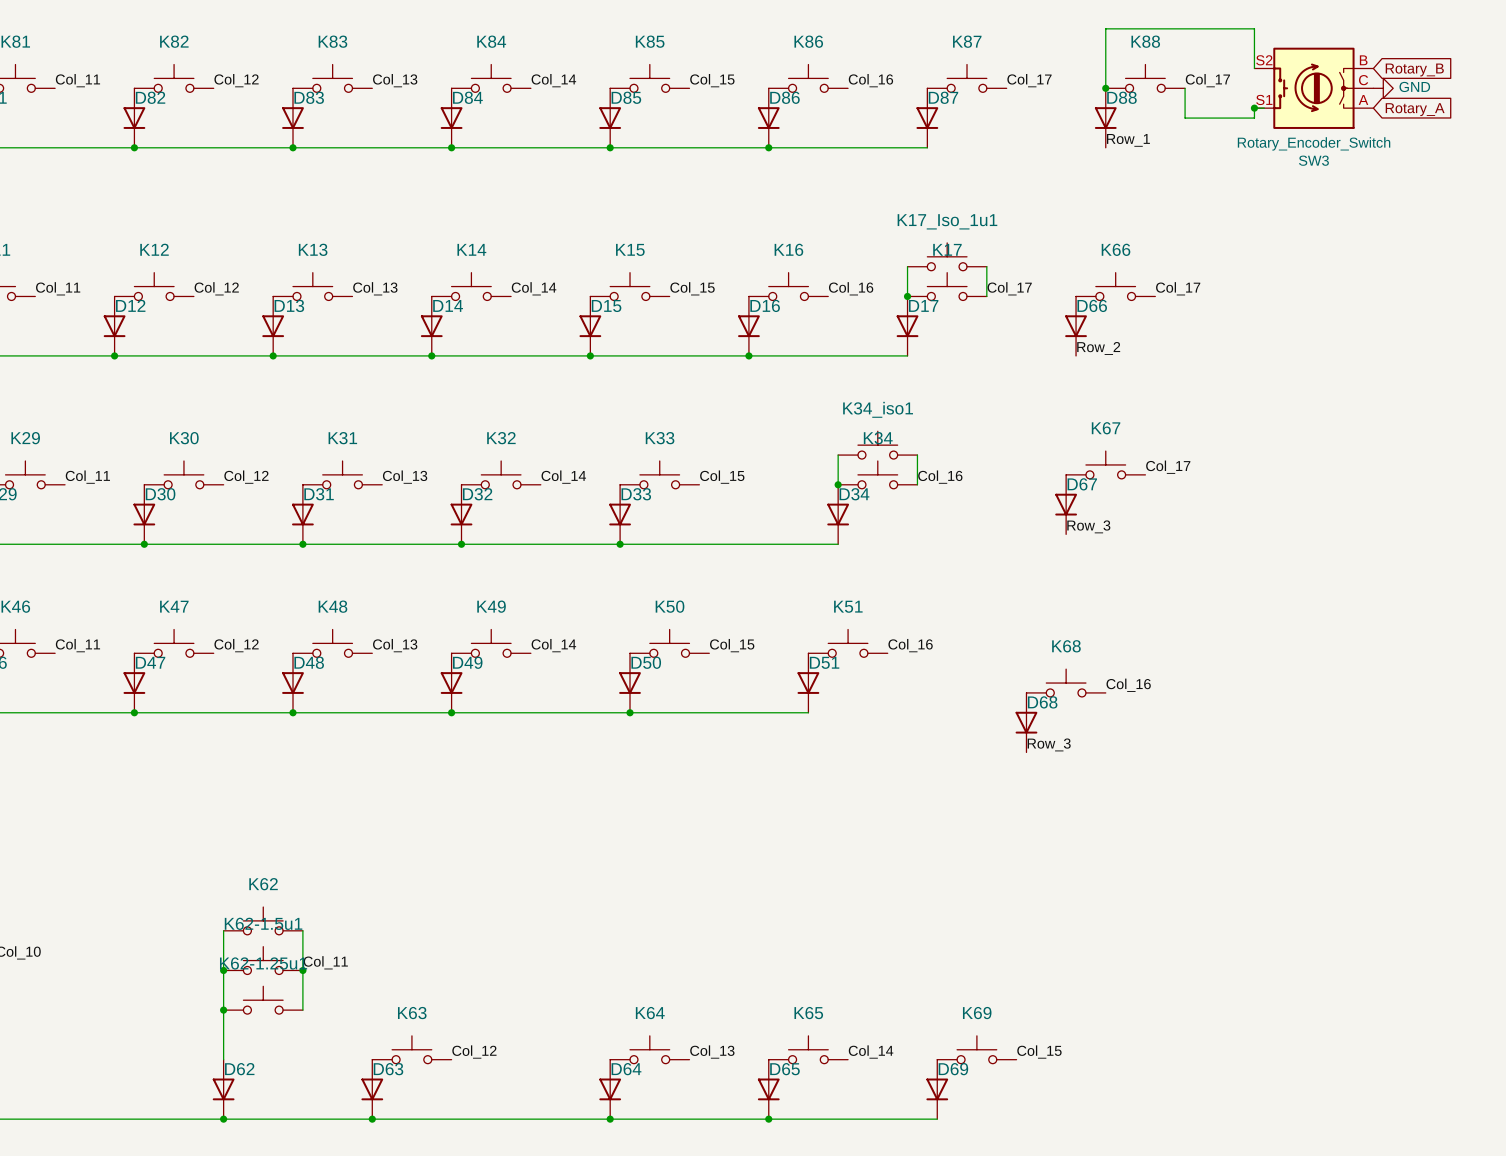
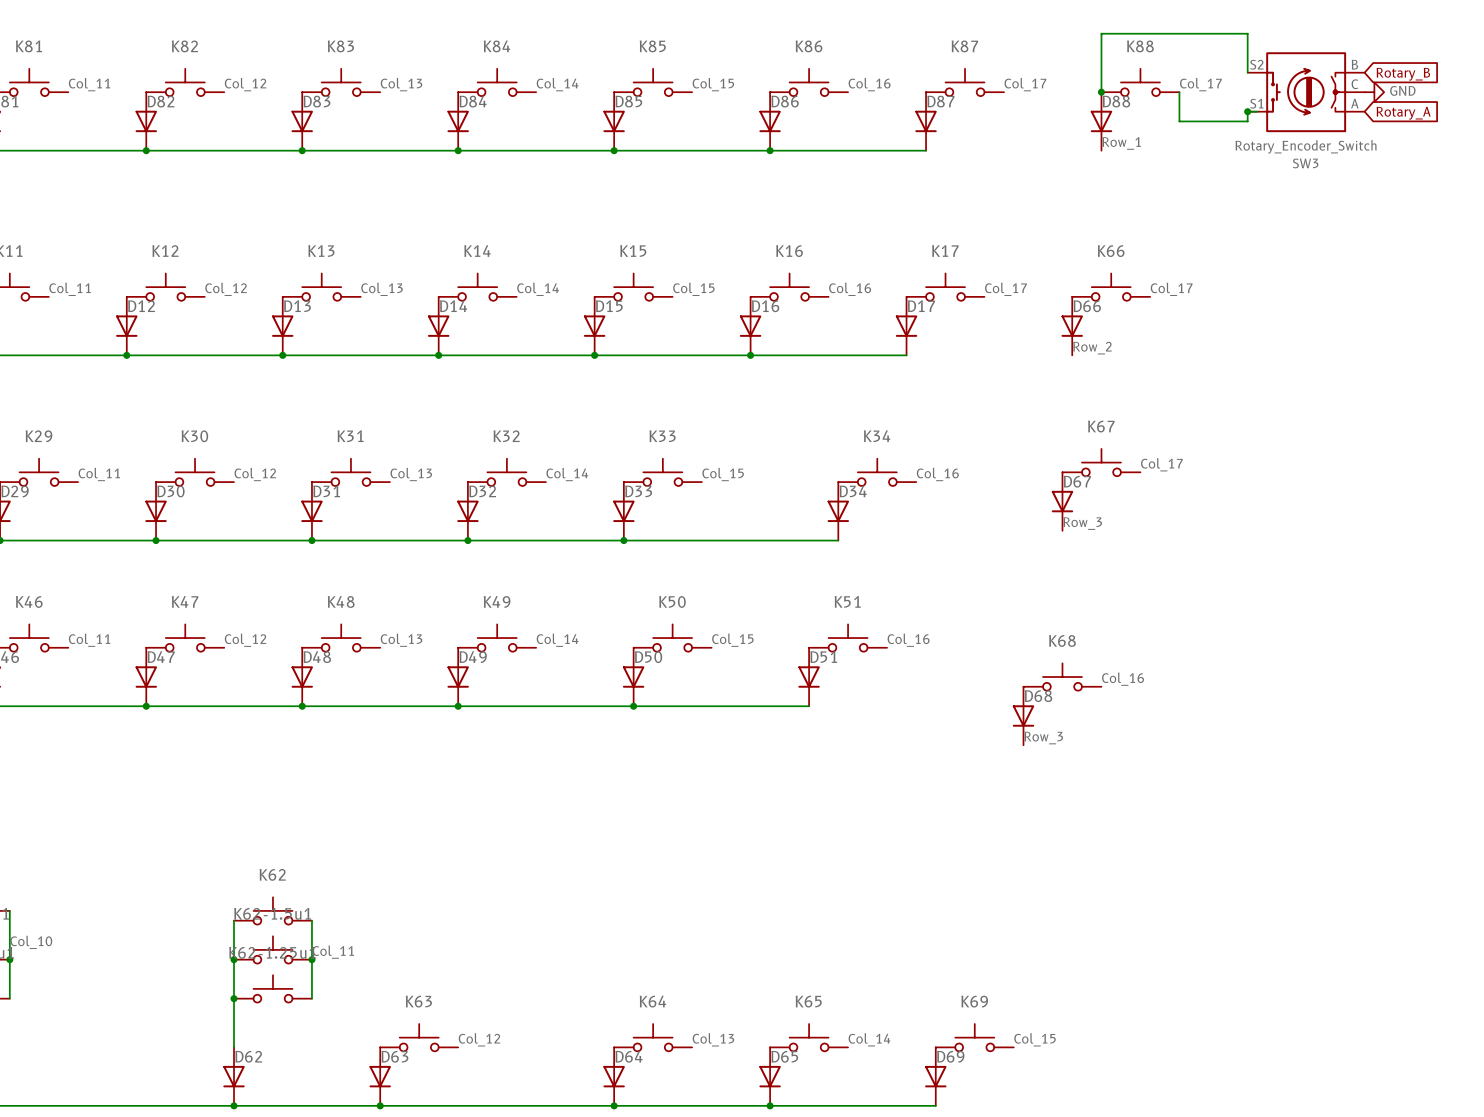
K17_Iso_1u1: (947, 256) -> none
wire: (907, 266) (907, 296) -> none
wire: (986, 266) (986, 296) -> none
junction: (907, 296) -> none
K34_iso1: (877, 445) -> none
wire: (838, 455) (838, 484) -> none
wire: (917, 455) (917, 484) -> none
junction: (838, 484) -> none

